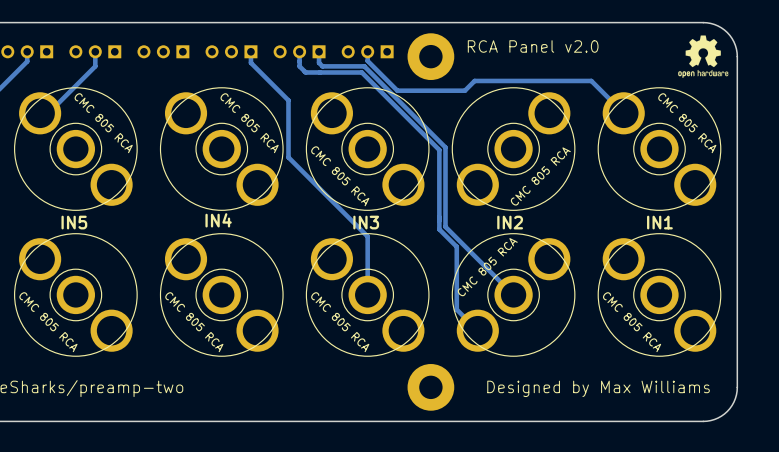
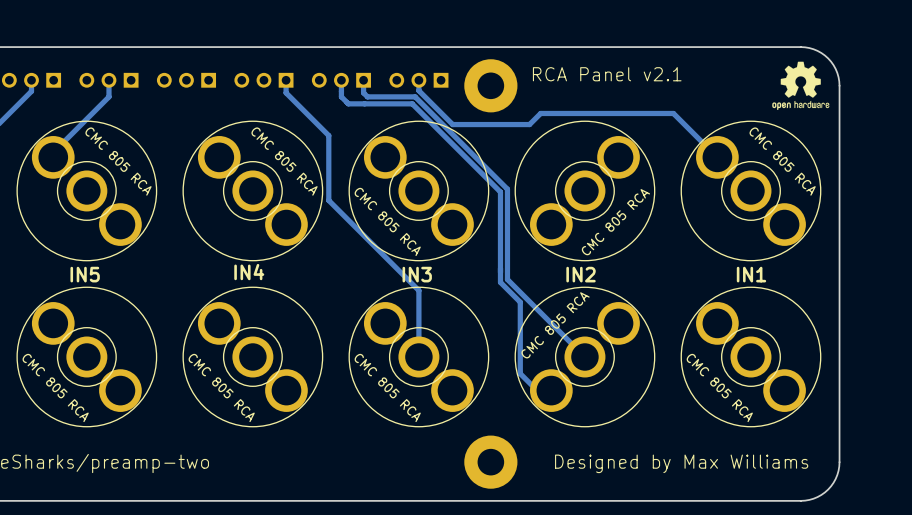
text: RCA Panel v2.0 (533, 46) -> RCA Panel v2.1 (607, 74)
part footprint: [14, 87, 138, 211] -> [16, 120, 158, 262]
part footprint: [159, 87, 284, 211] -> [182, 120, 324, 262]
part footprint: [305, 87, 430, 211] -> [348, 120, 490, 262]
part footprint: [451, 87, 576, 211] -> [514, 120, 656, 262]
part footprint: [597, 87, 722, 211] -> [680, 120, 822, 262]
part footprint: [14, 233, 138, 357] -> [16, 286, 158, 428]
part footprint: [159, 233, 284, 357] -> [182, 286, 324, 428]
part footprint: [305, 233, 430, 357] -> [348, 286, 490, 428]
part footprint: [451, 233, 576, 357] -> [514, 286, 656, 428]
part footprint: [597, 233, 722, 357] -> [680, 286, 822, 428]

